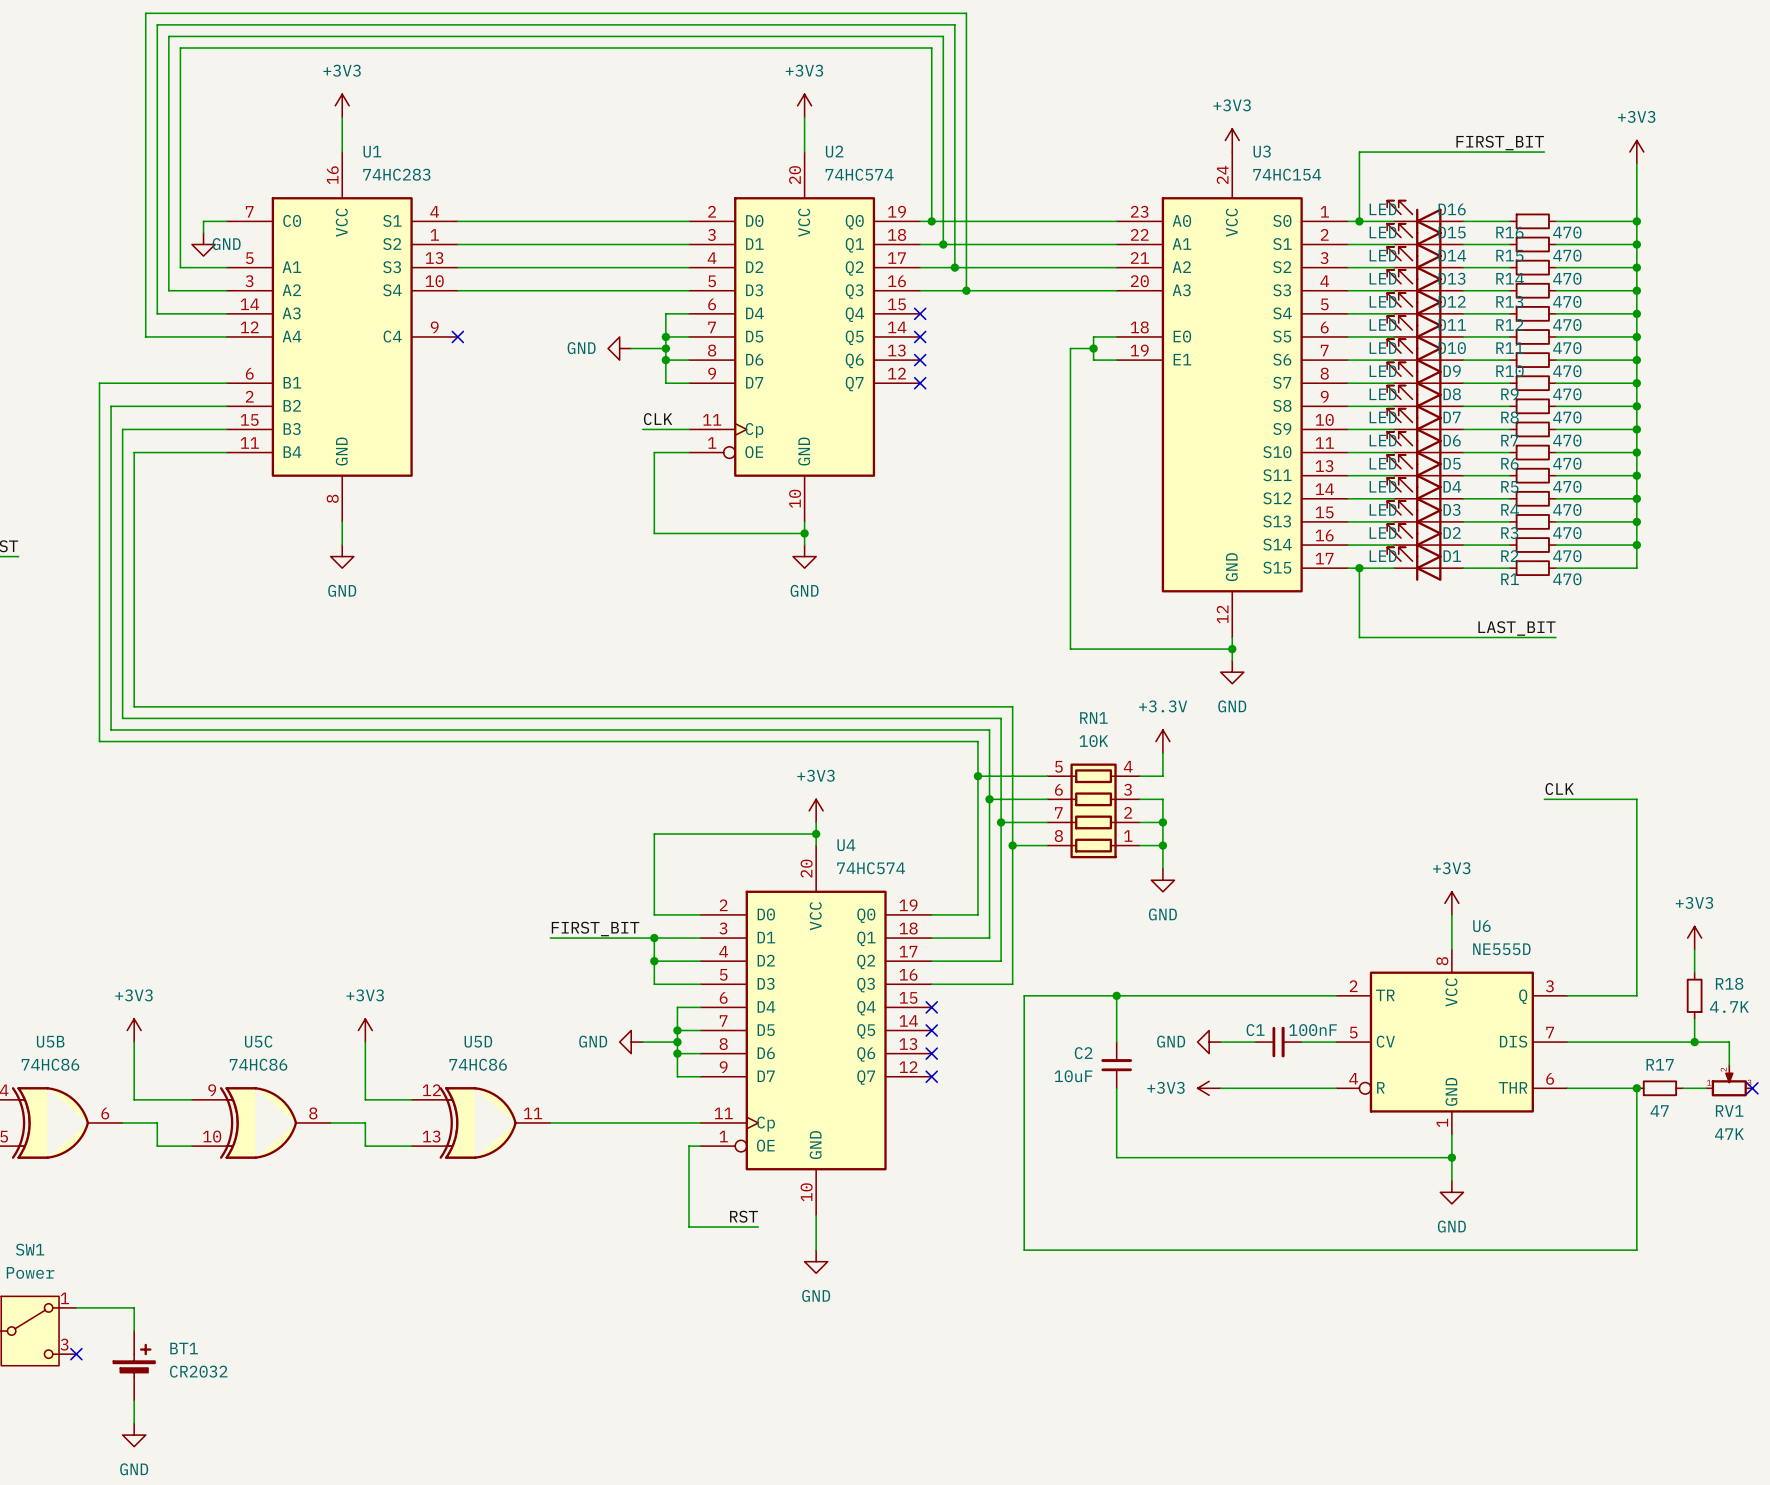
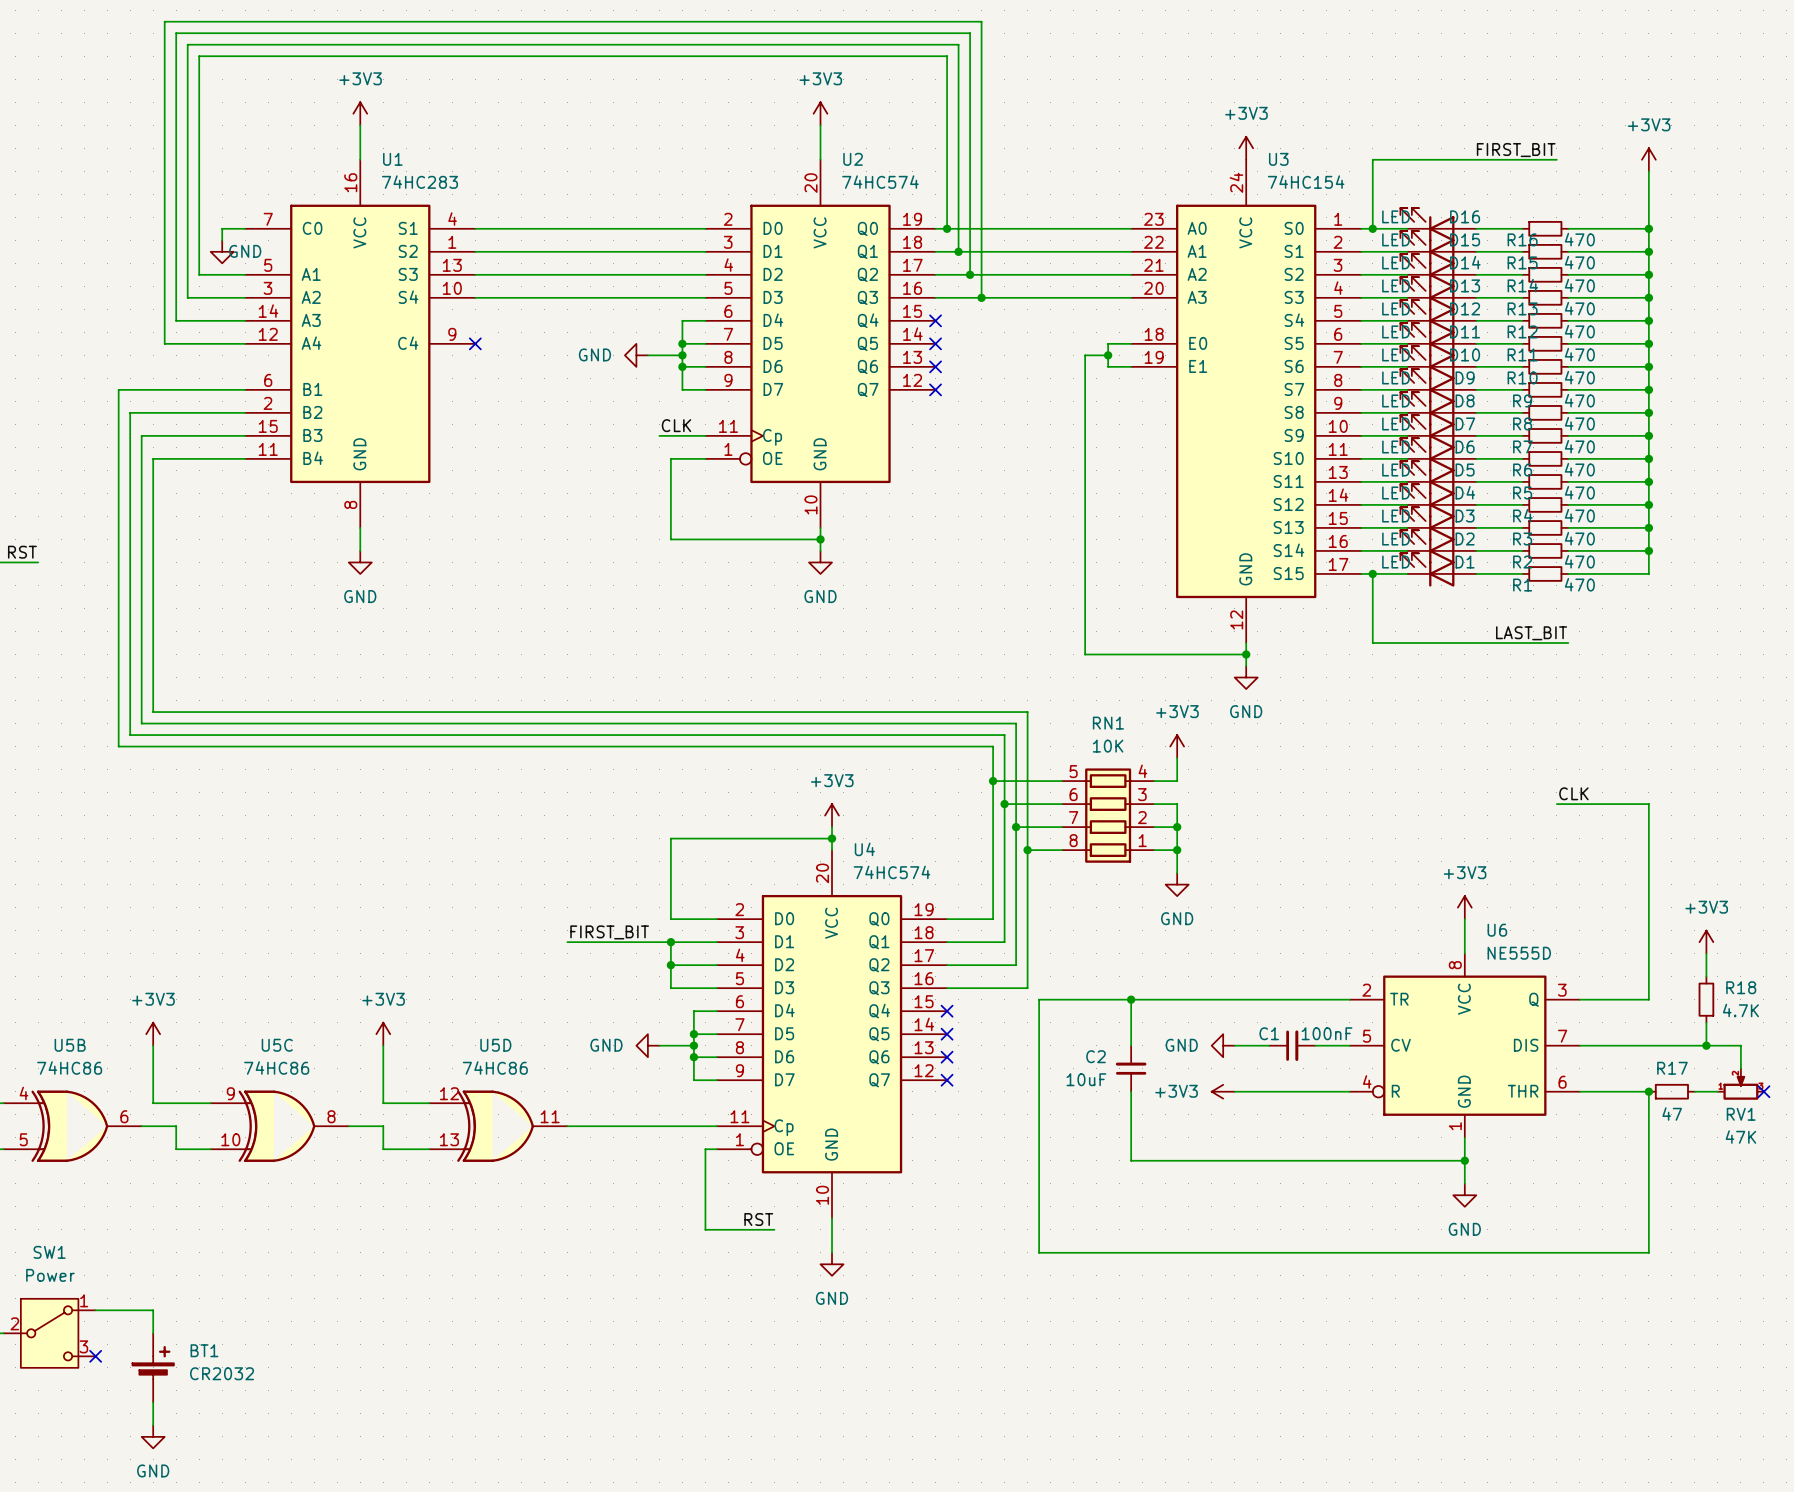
power symbol: +3.3V (1162, 741) -> +3V3 (1177, 746)

